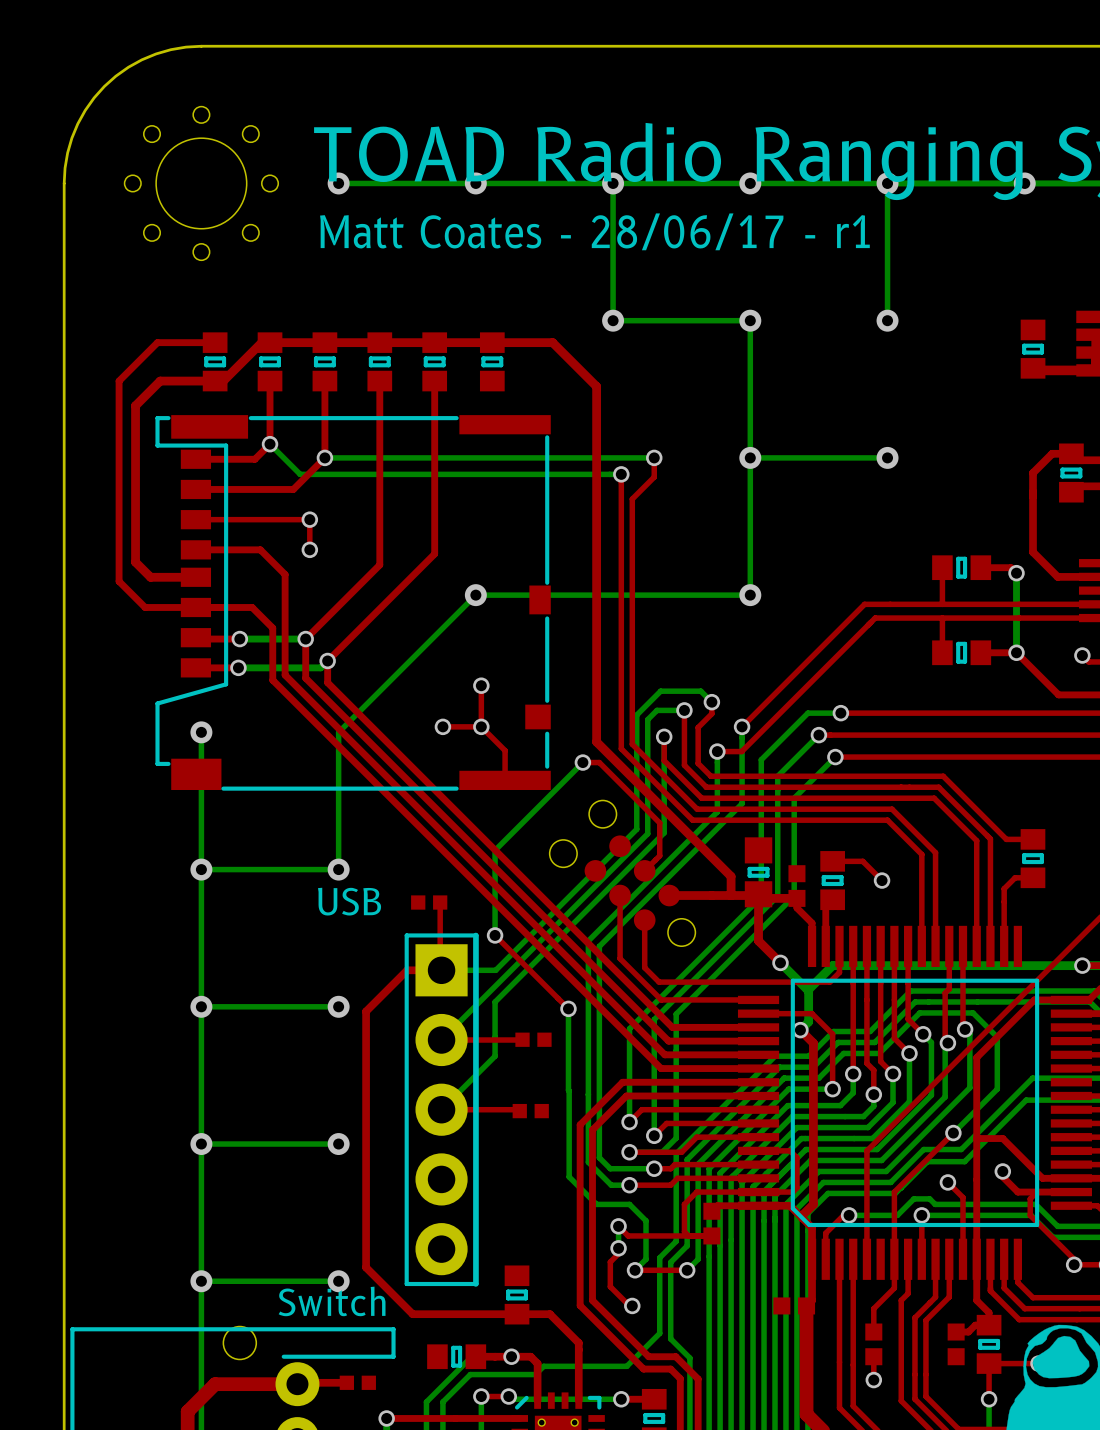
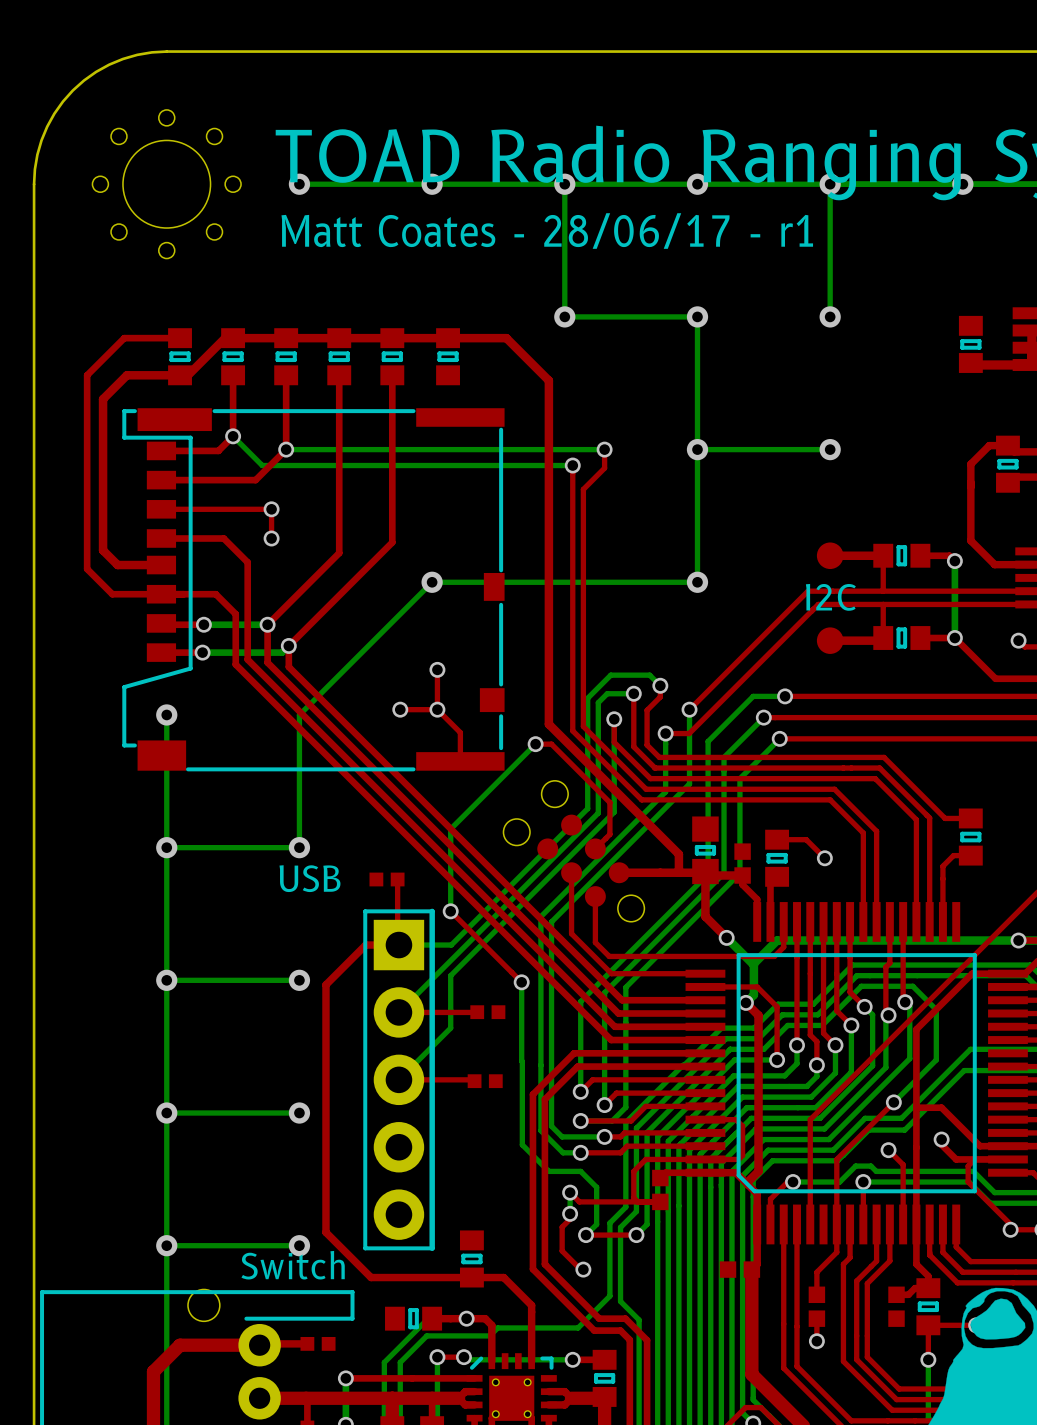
top track: none -> (830, 555) (883, 555)
part: none -> (830, 555)
text: none -> I2C (830, 597)
top track: none -> (883, 638) (880, 640) (830, 640)
part: none -> (830, 640)

